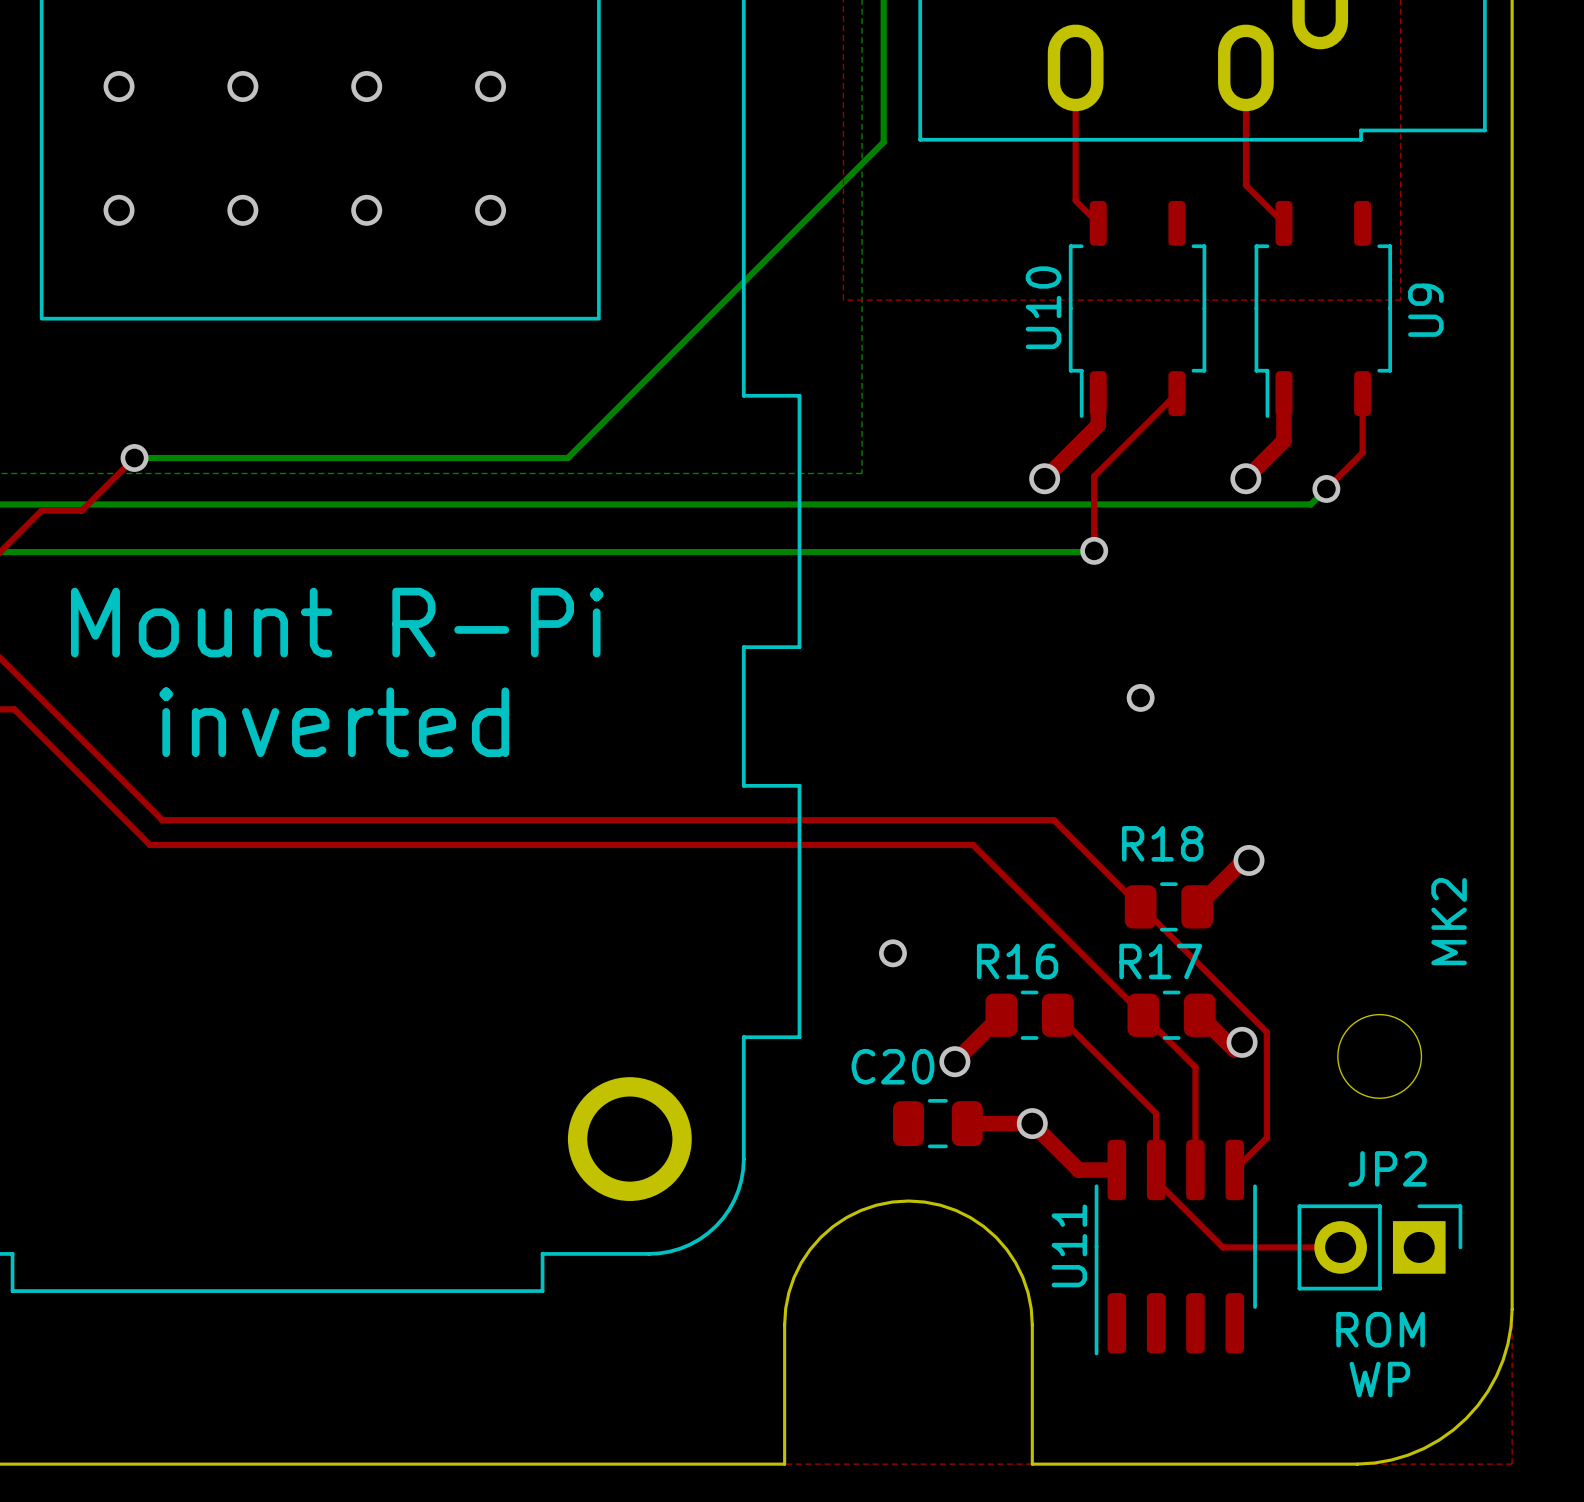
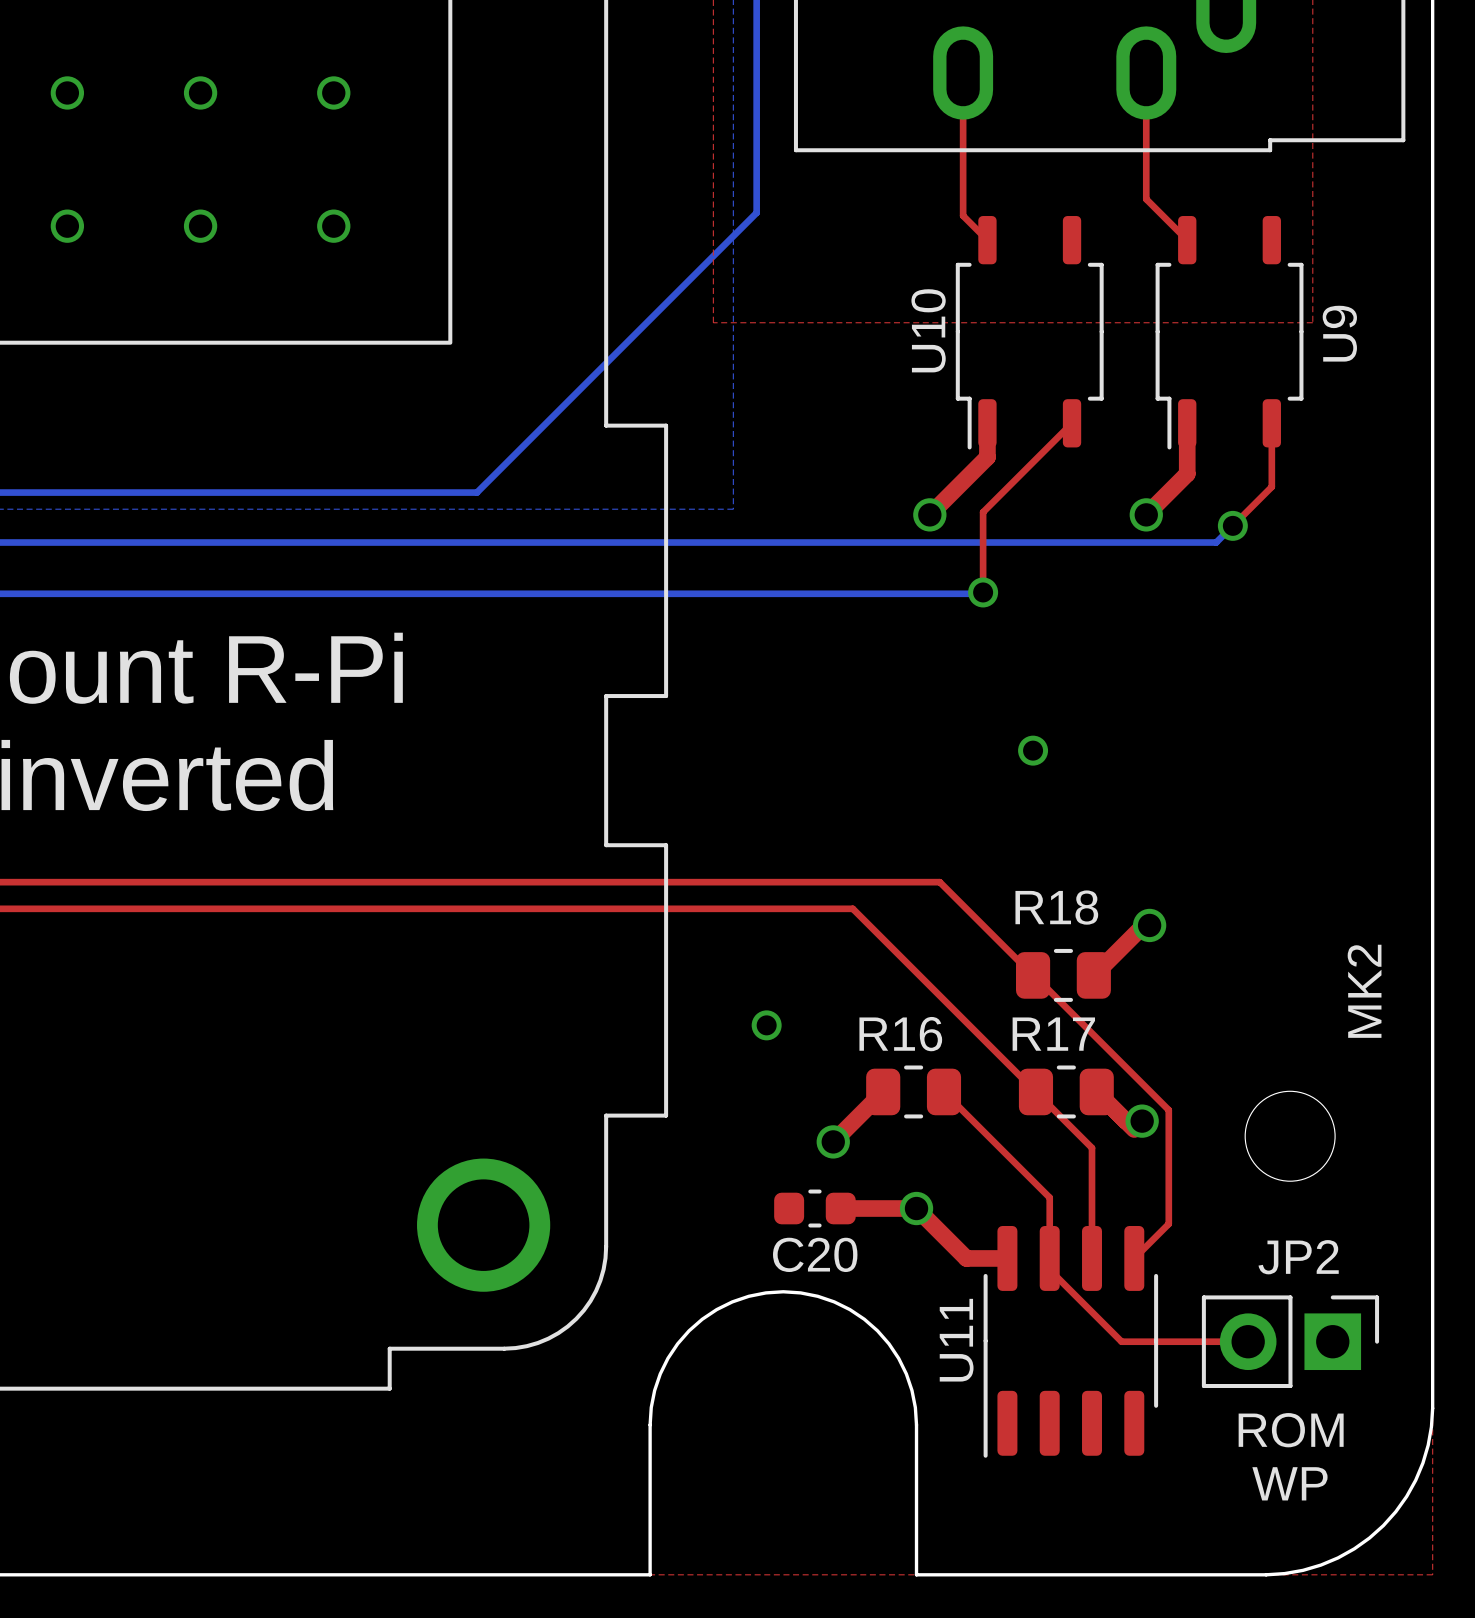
bottom track: (883, 142) (567, 458) -> (756, 152) (756, 212) (476, 492) (417, 492)
C20 name position: C20 (892, 1066) -> C20 (815, 1254)
C20 footprint: [892, 1098, 983, 1149] -> [774, 1189, 856, 1228]

